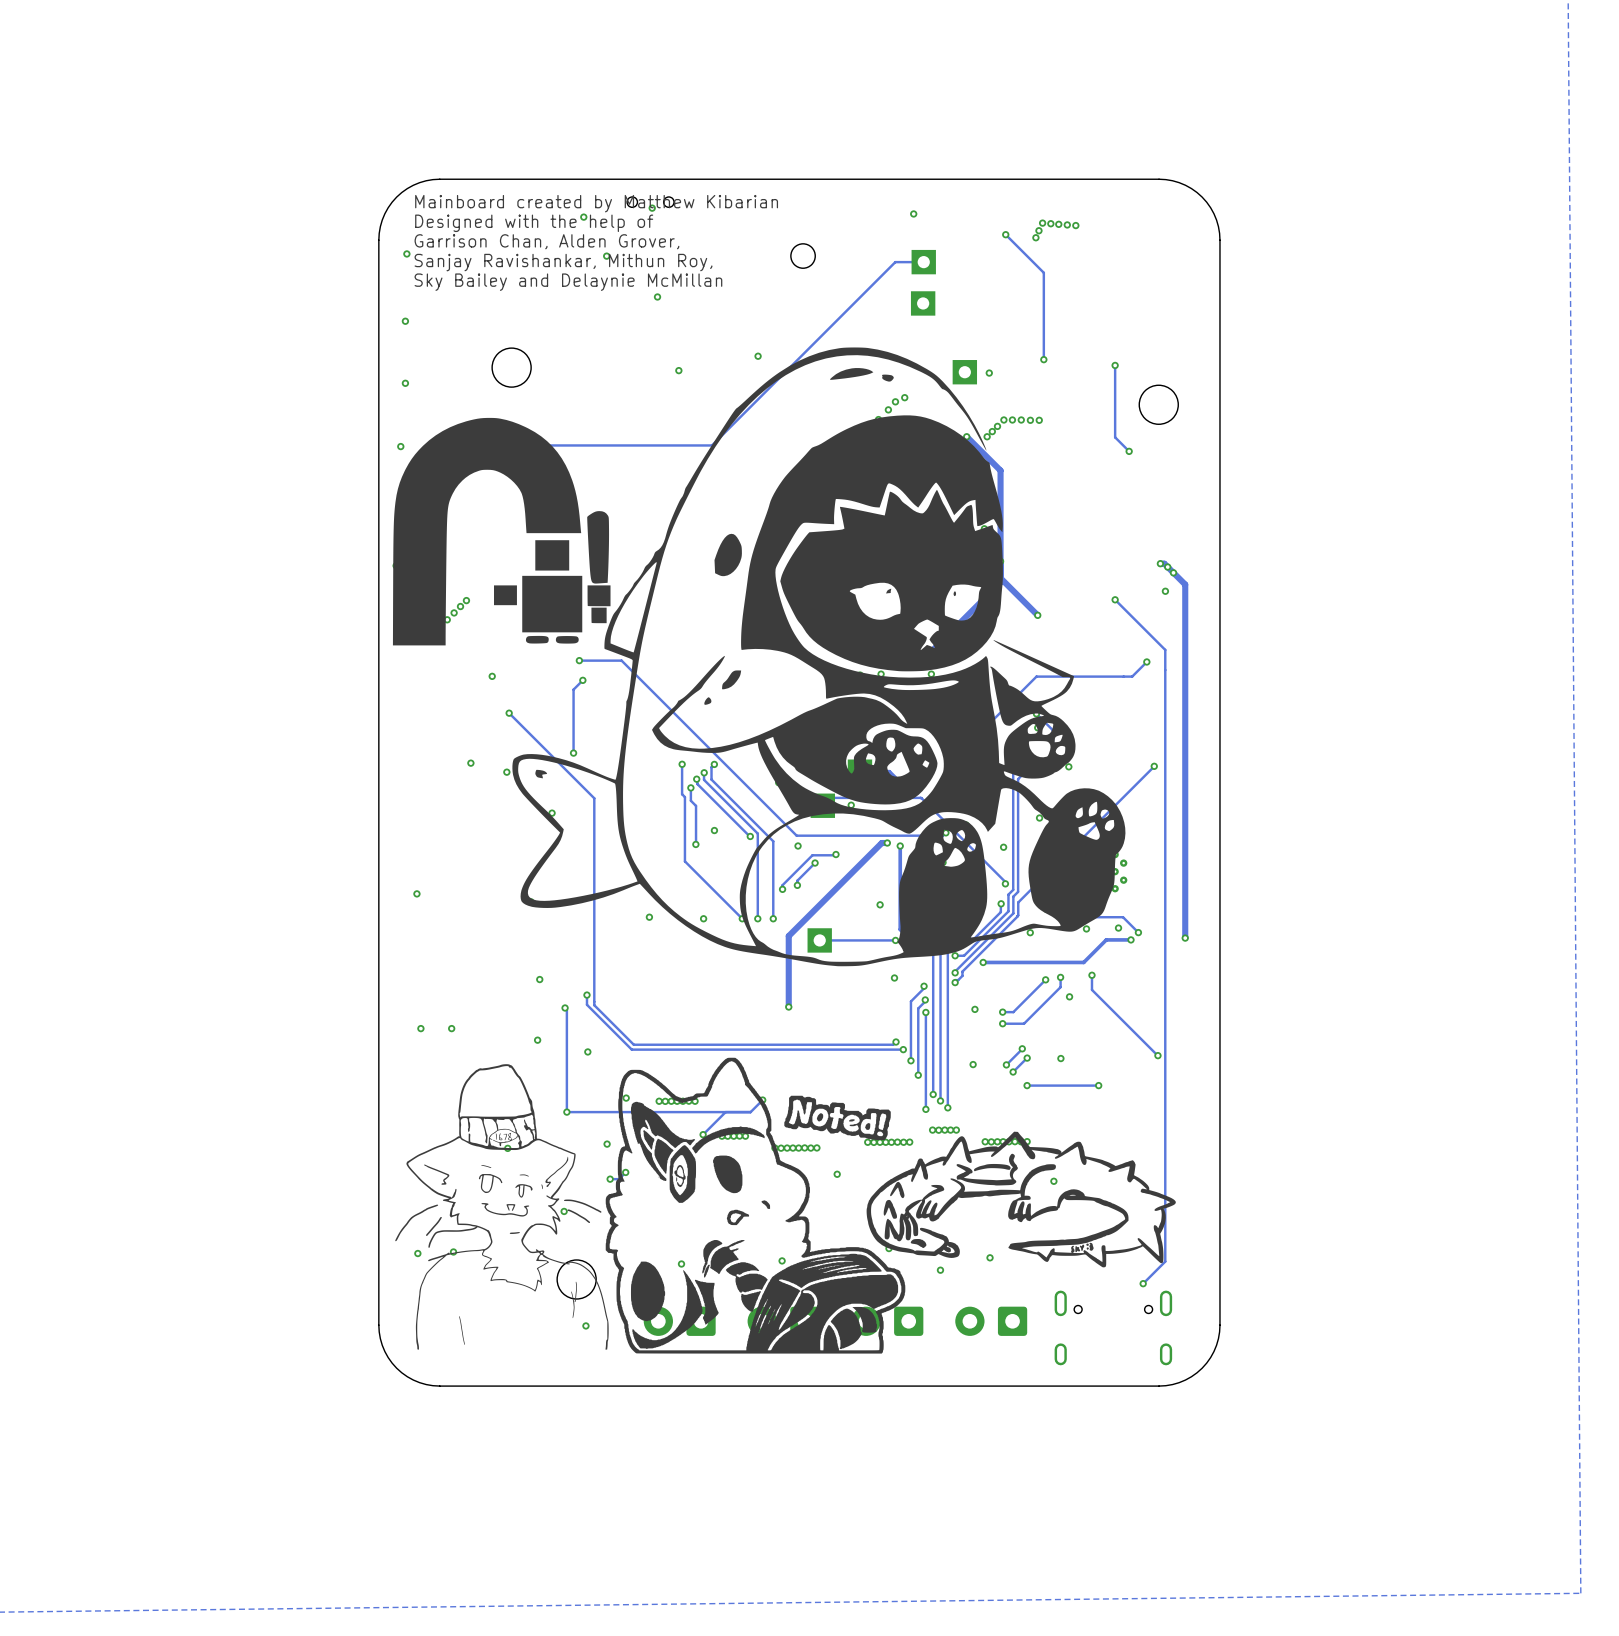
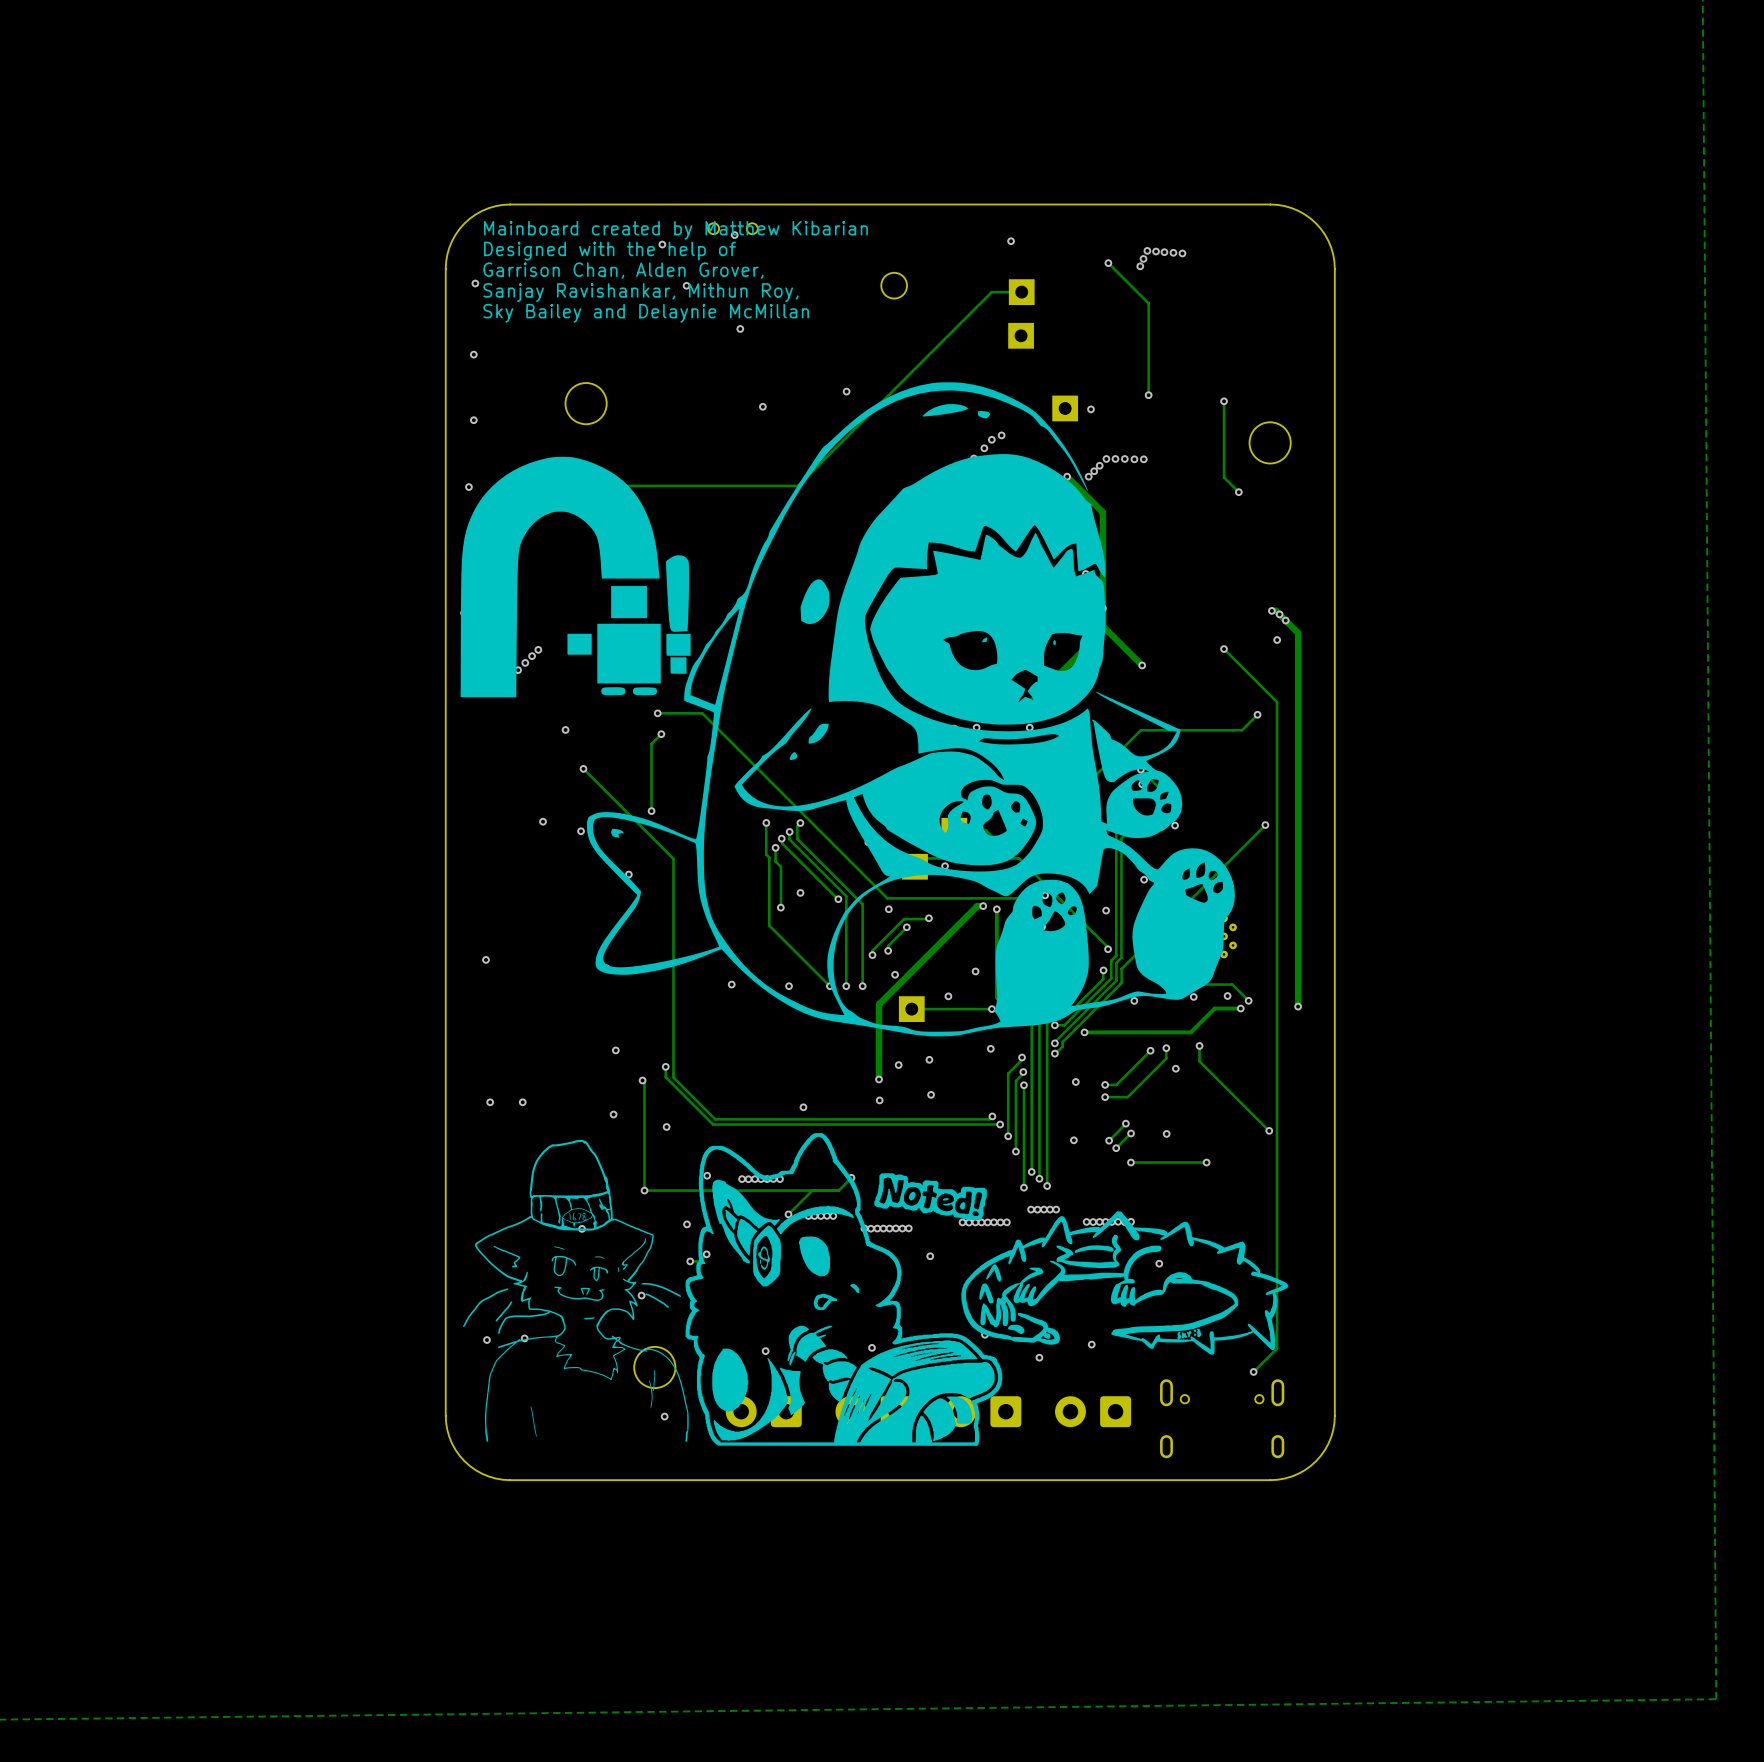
via: none -> (895, 974)
via: none -> (948, 996)
via: none -> (929, 1059)
via: none -> (898, 1065)
via: none -> (931, 1094)
via: none -> (879, 1100)
via: none -> (803, 1107)

